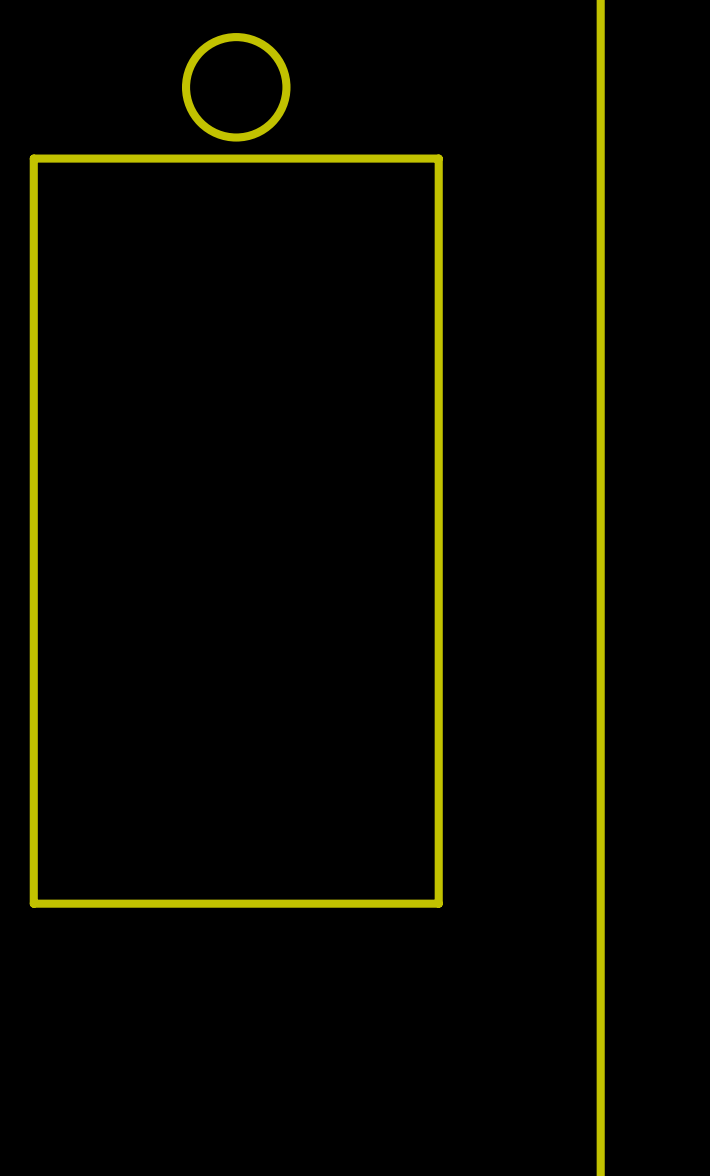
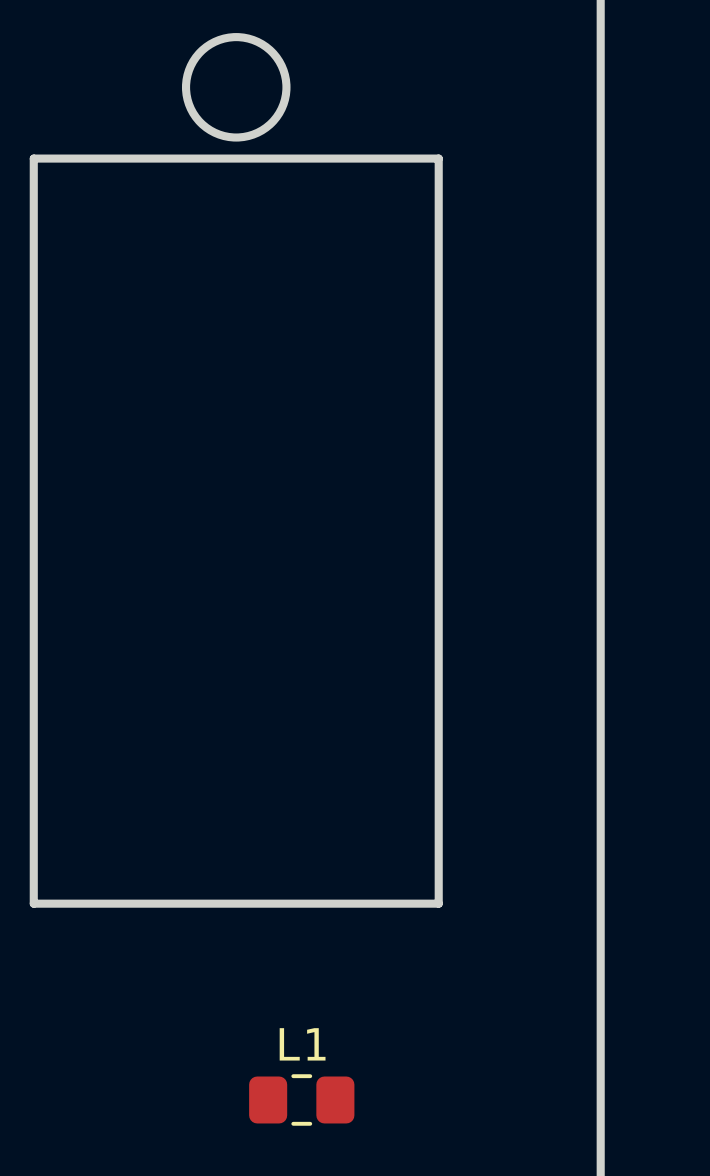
L1: none -> (301, 1099)

